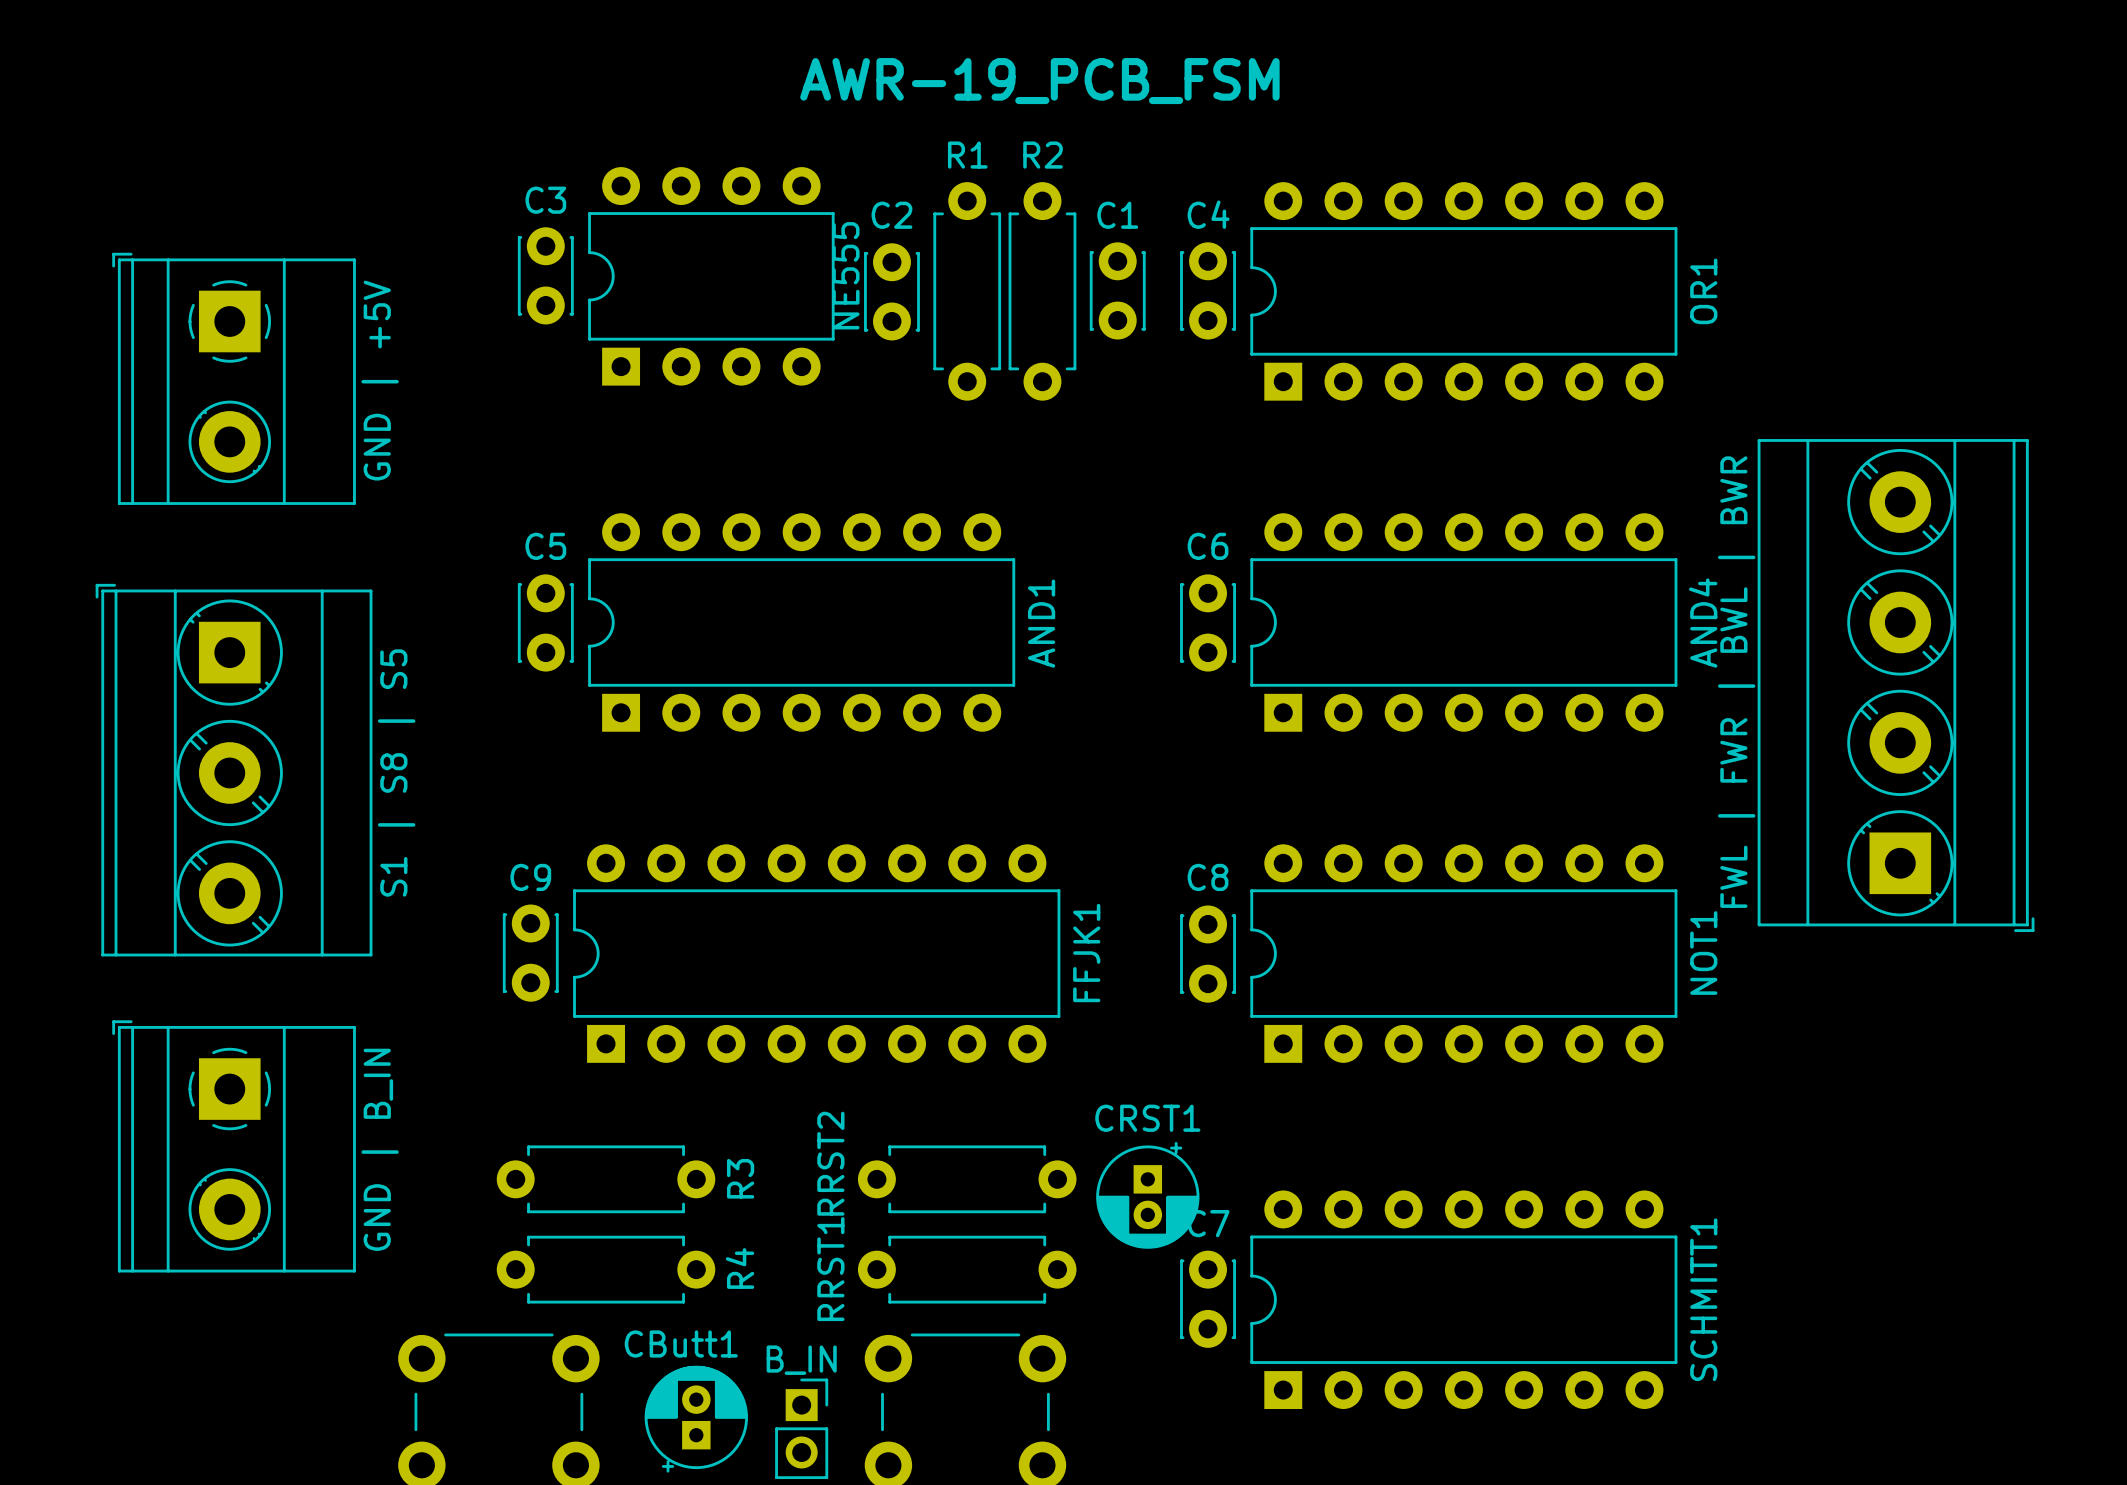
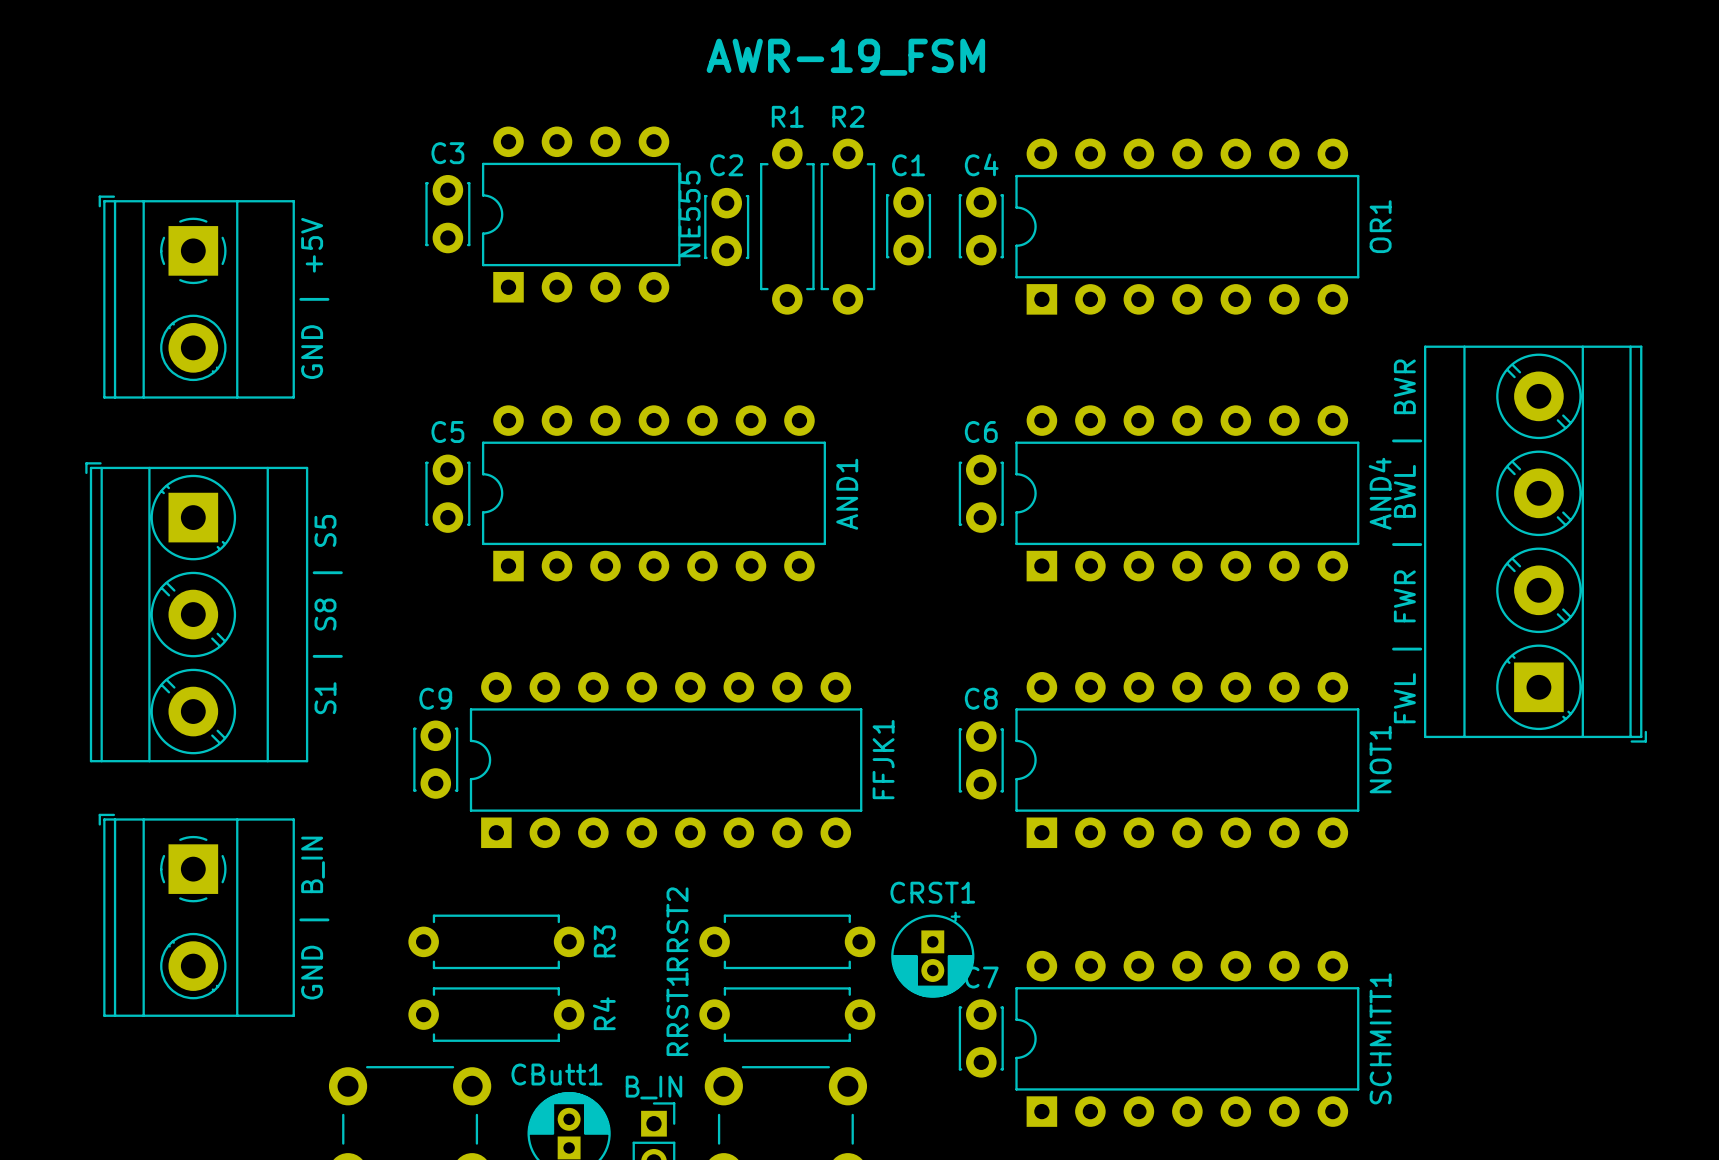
text: AWR-19_PCB_FSM (1039, 81) -> AWR-19_FSM (845, 57)

